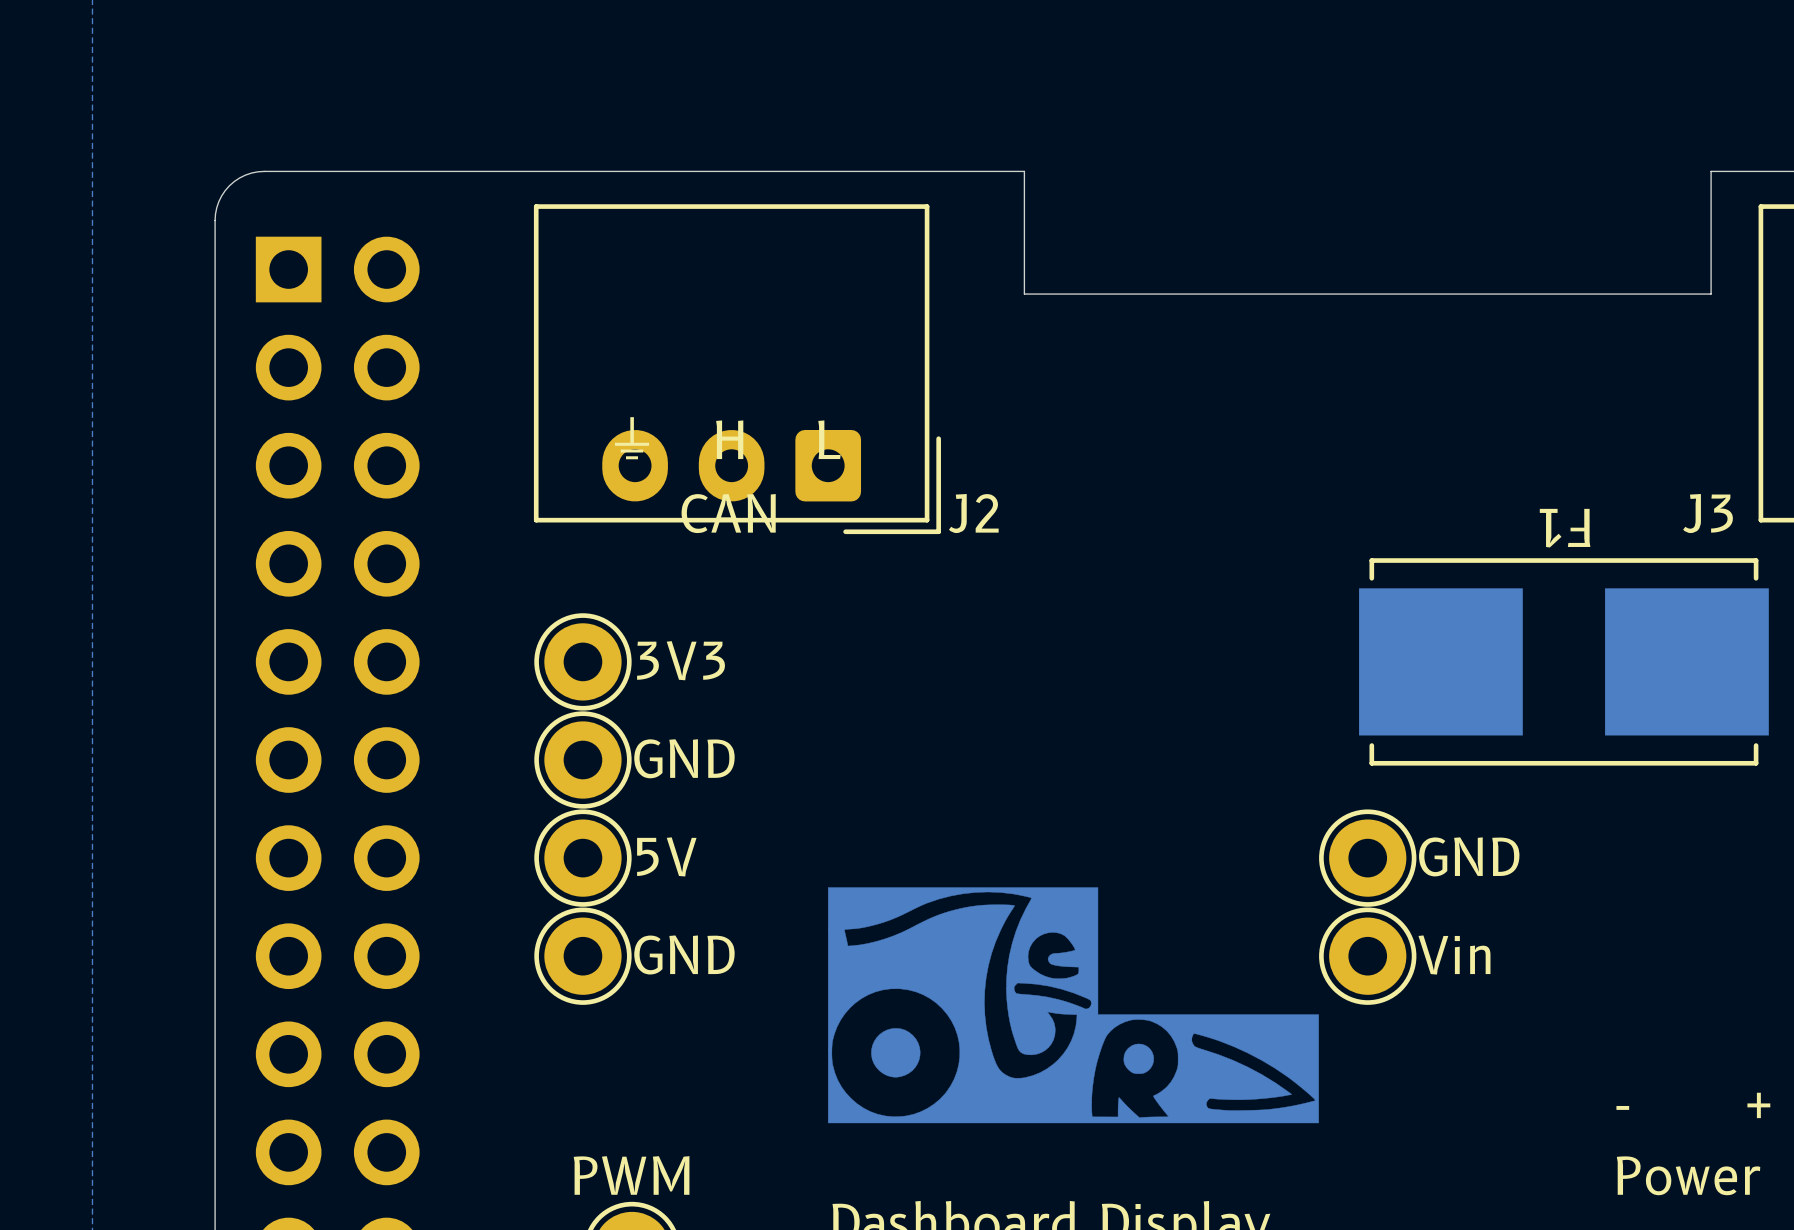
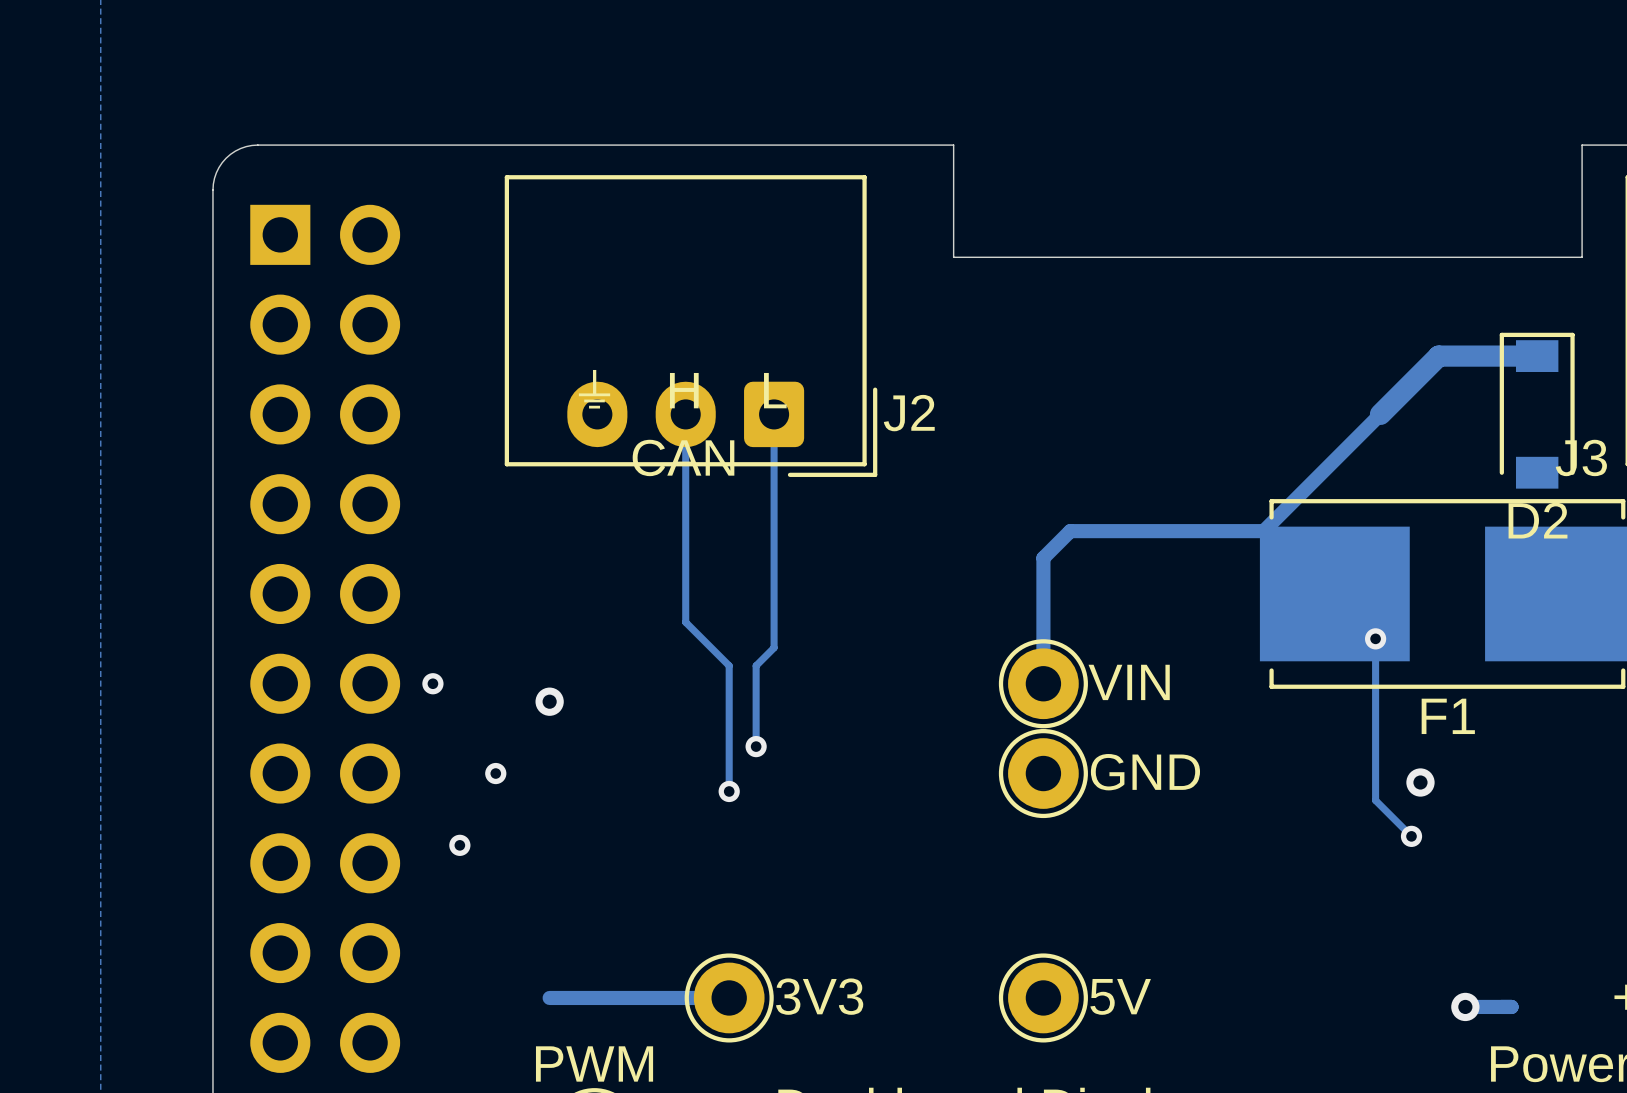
track: none -> (1537, 356) (1438, 356) (1263, 531) (1070, 531) (1043, 558) (1043, 683)
D2: none -> (1537, 410)
track: none -> (685, 414) (685, 622) (729, 665) (729, 791)
track: none -> (774, 414) (774, 647) (756, 665) (756, 746)
J2 name position: J2 (973, 513) -> J2 (909, 413)
F1 name rotation: 0° (1565, 528) -> 180° (1448, 716)
F1 name position: F1 (1565, 528) -> F1 (1448, 716)
text position: 3V3 (681, 660) -> 3V3 (819, 996)
part: (582, 661) -> none
track: none -> (1375, 638) (1375, 800) (1411, 836)
via: none -> (1375, 638)
text: GND (684, 758) -> none
text: none -> VIN (1129, 682)
via: none -> (432, 683)
part: (582, 760) -> none
part: none -> (1043, 683)
via: none -> (549, 701)
via: none -> (756, 746)
text position: 5V (666, 856) -> 5V (1120, 996)
text position: GND (1469, 856) -> GND (1145, 772)
via: none -> (495, 773)
part: (582, 858) -> none
part: none -> (1043, 773)
part: (1367, 858) -> none
via: none -> (1420, 782)
via: none -> (729, 791)
drawing: [828, 887, 1319, 1124] -> none
via: none -> (1411, 836)
via: none -> (459, 845)
text: GND (684, 954) -> none
text: Vin (1454, 955) -> none
part: (582, 956) -> none
part: (1367, 956) -> none
track: none -> (729, 997) (549, 997)
part: none -> (729, 997)
part: none -> (1043, 997)
text: - (1622, 1107) -> none
via: none -> (1465, 1006)
track: none -> (1511, 1006) (1465, 1006)

